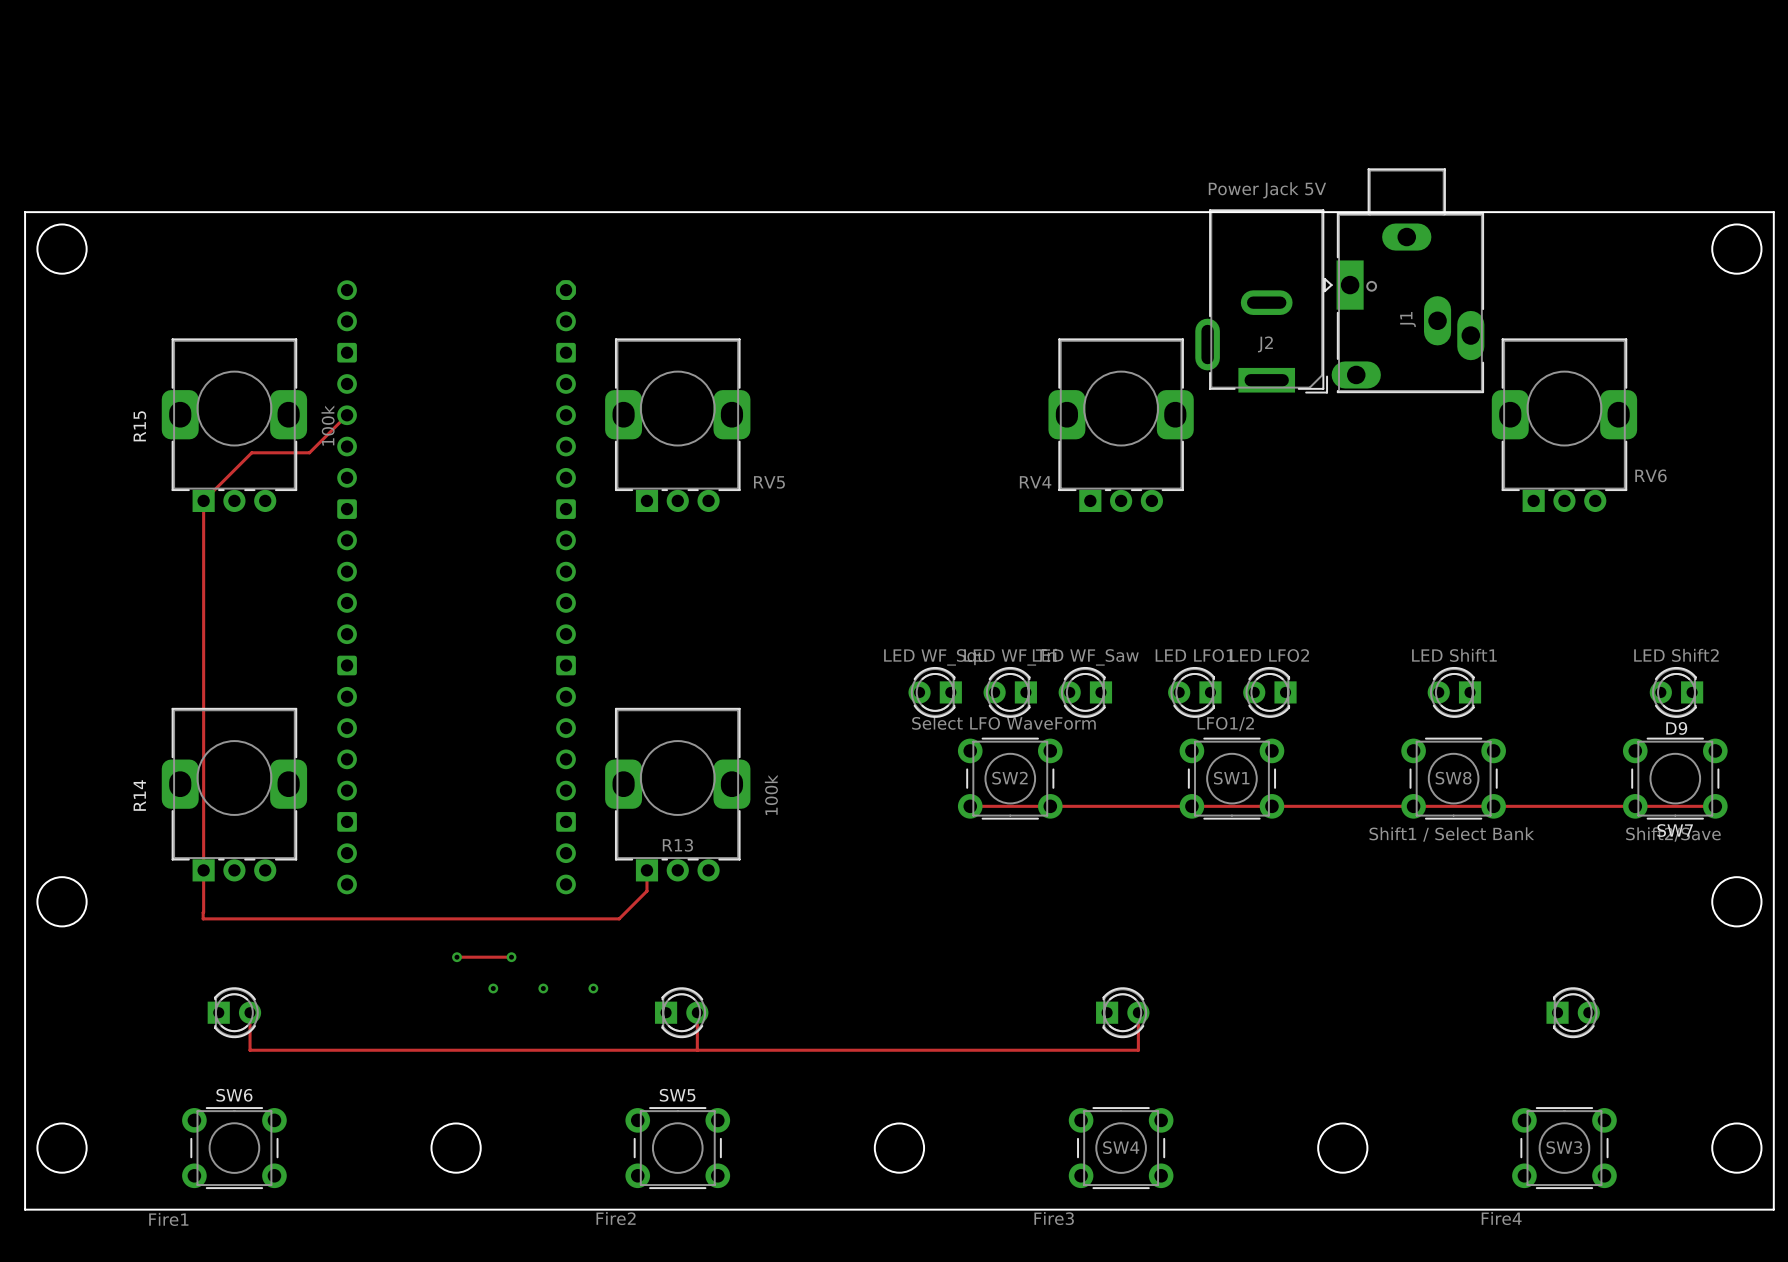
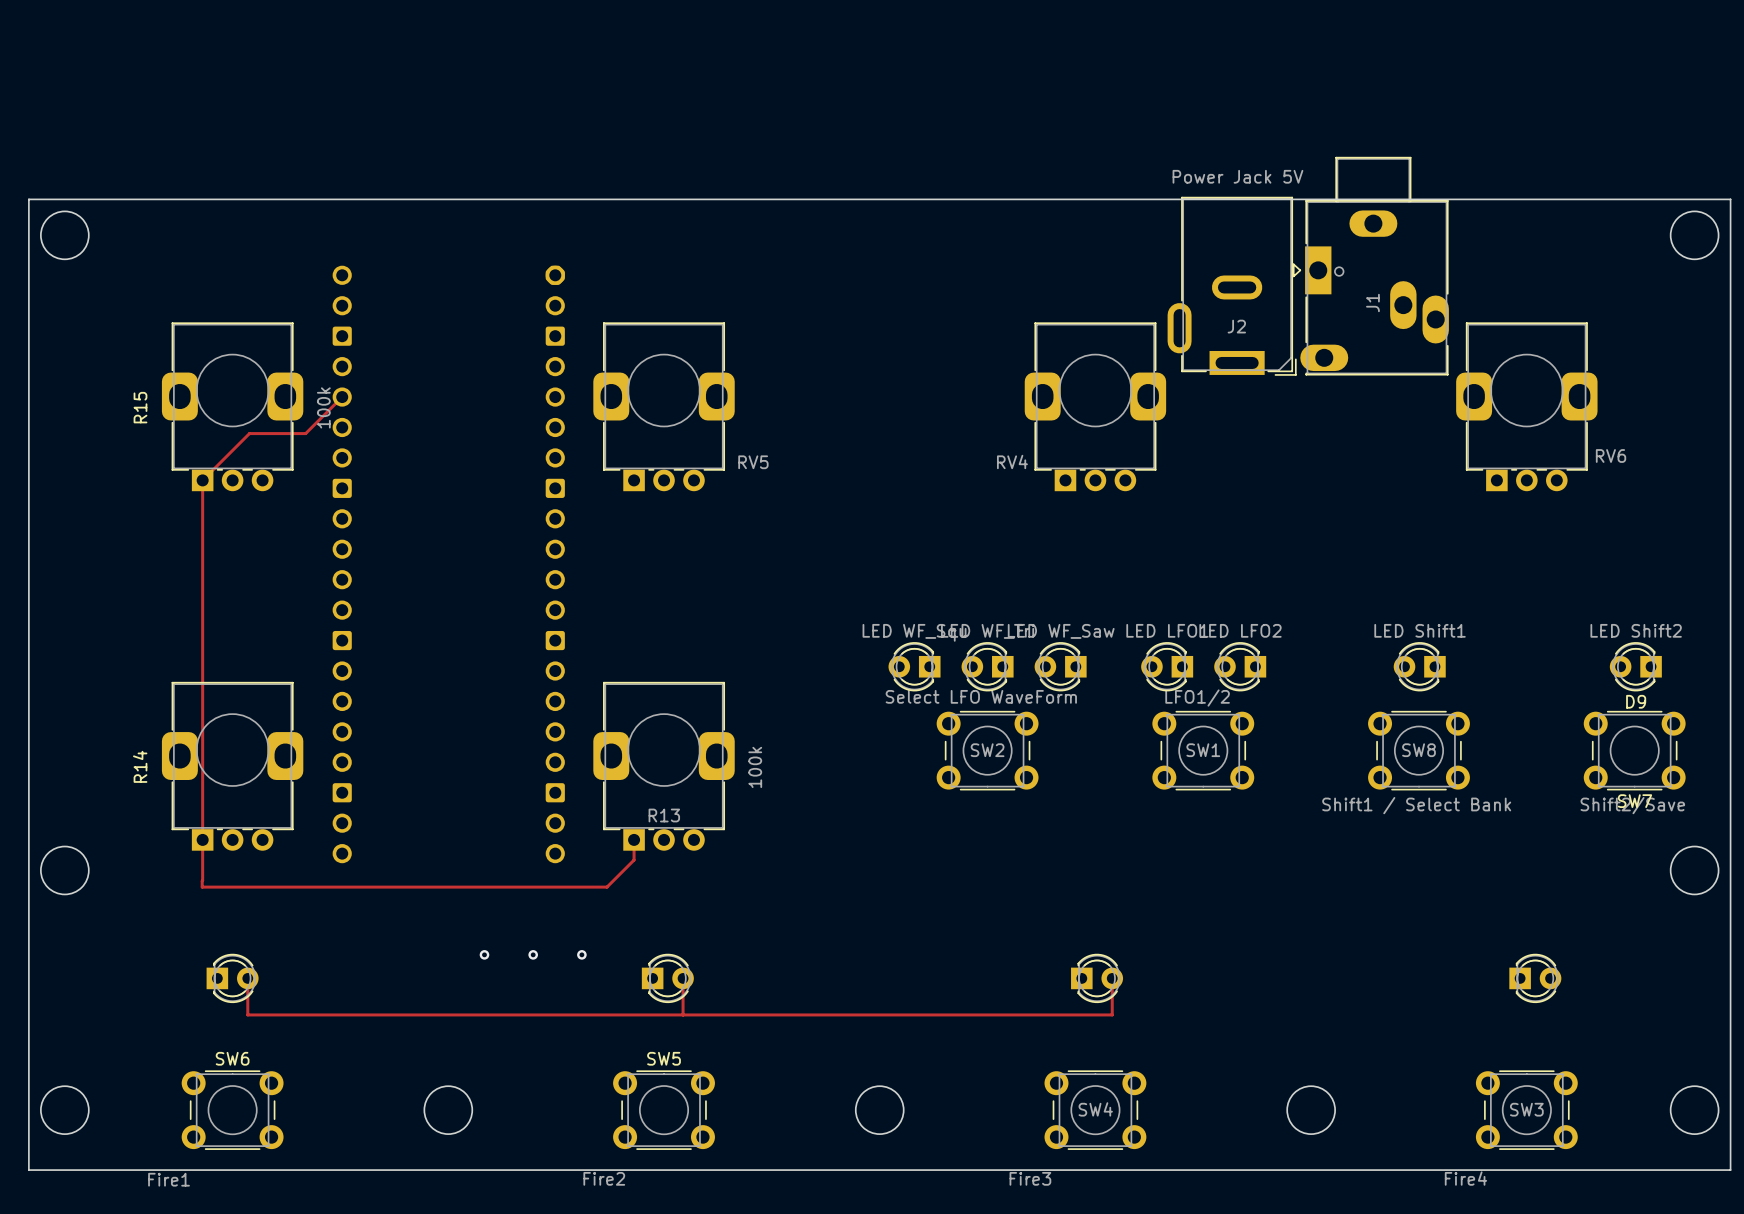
track: (970, 806) (1715, 806) -> none
track: (457, 957) (511, 957) -> none
via: (457, 957) -> none
via: (511, 957) -> none

